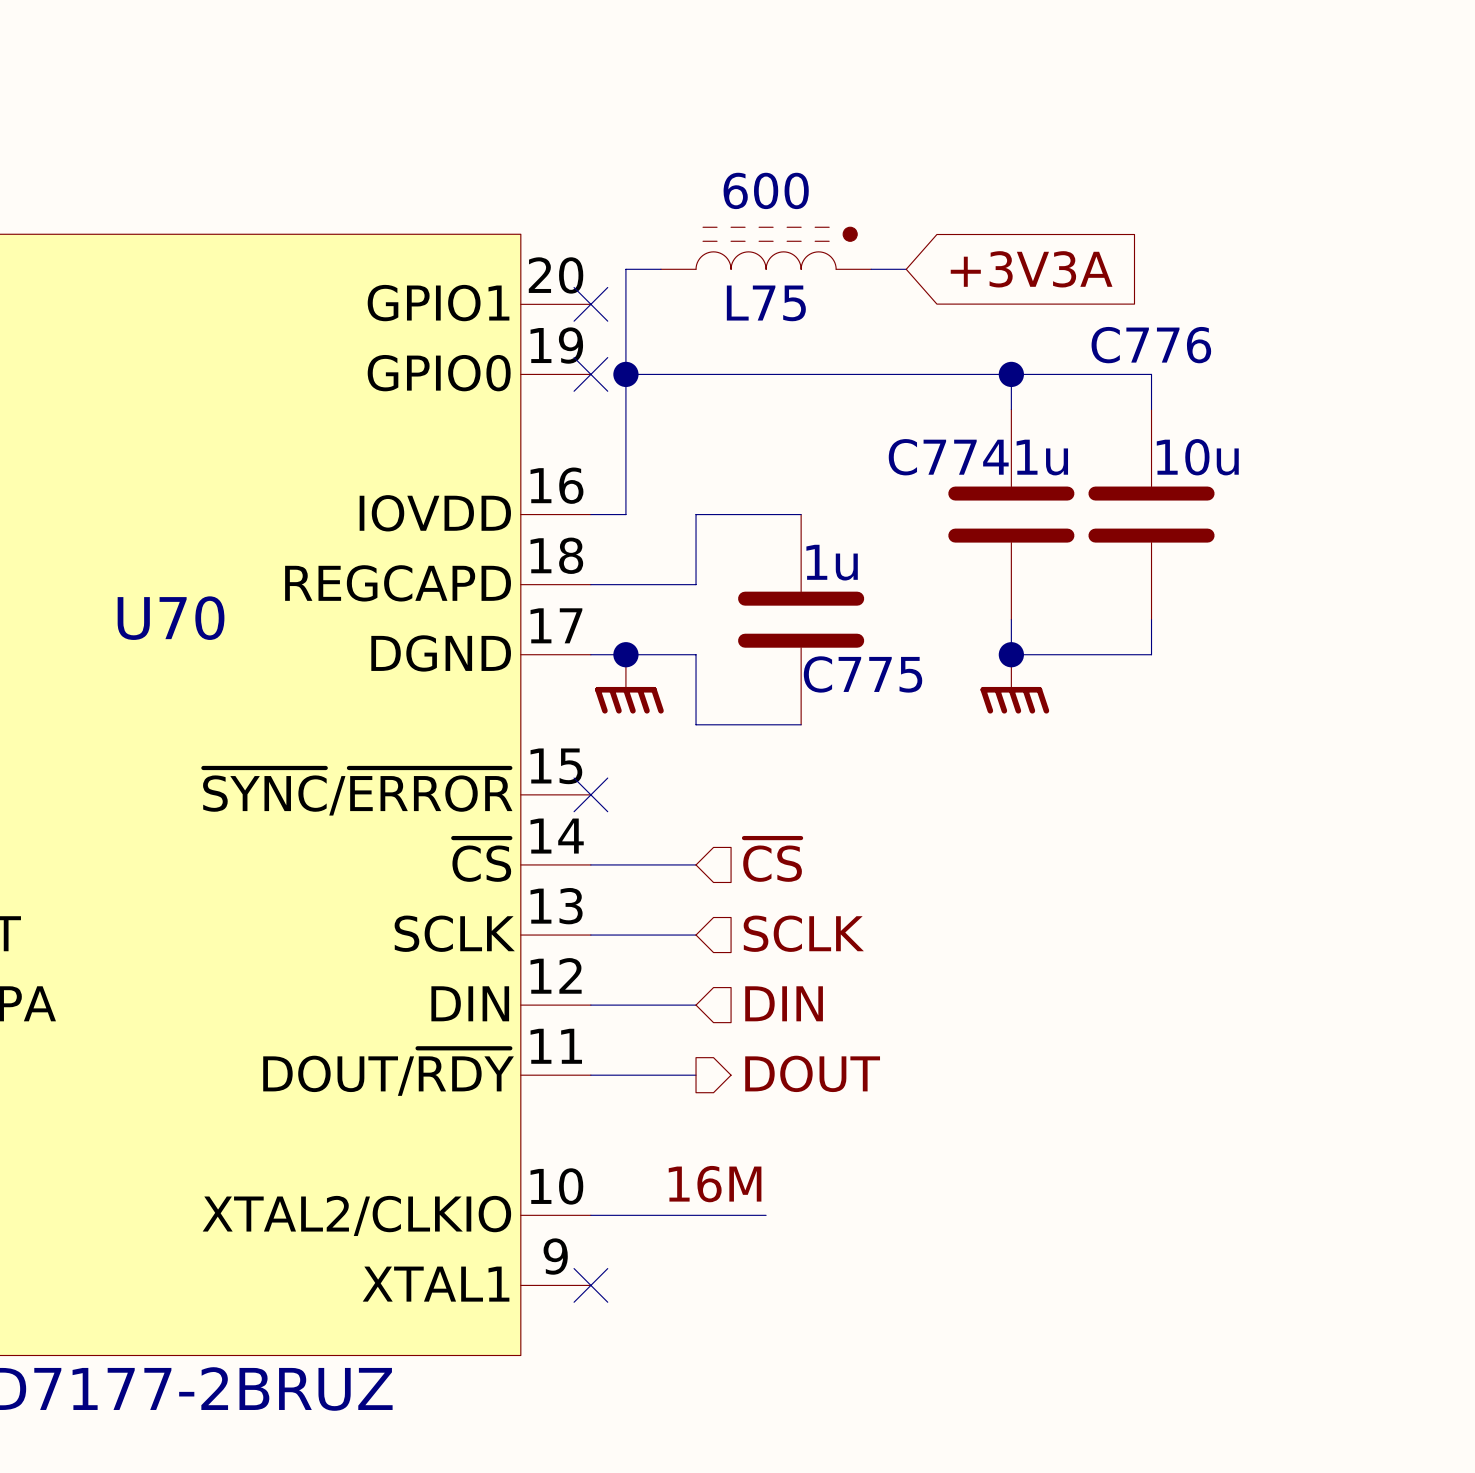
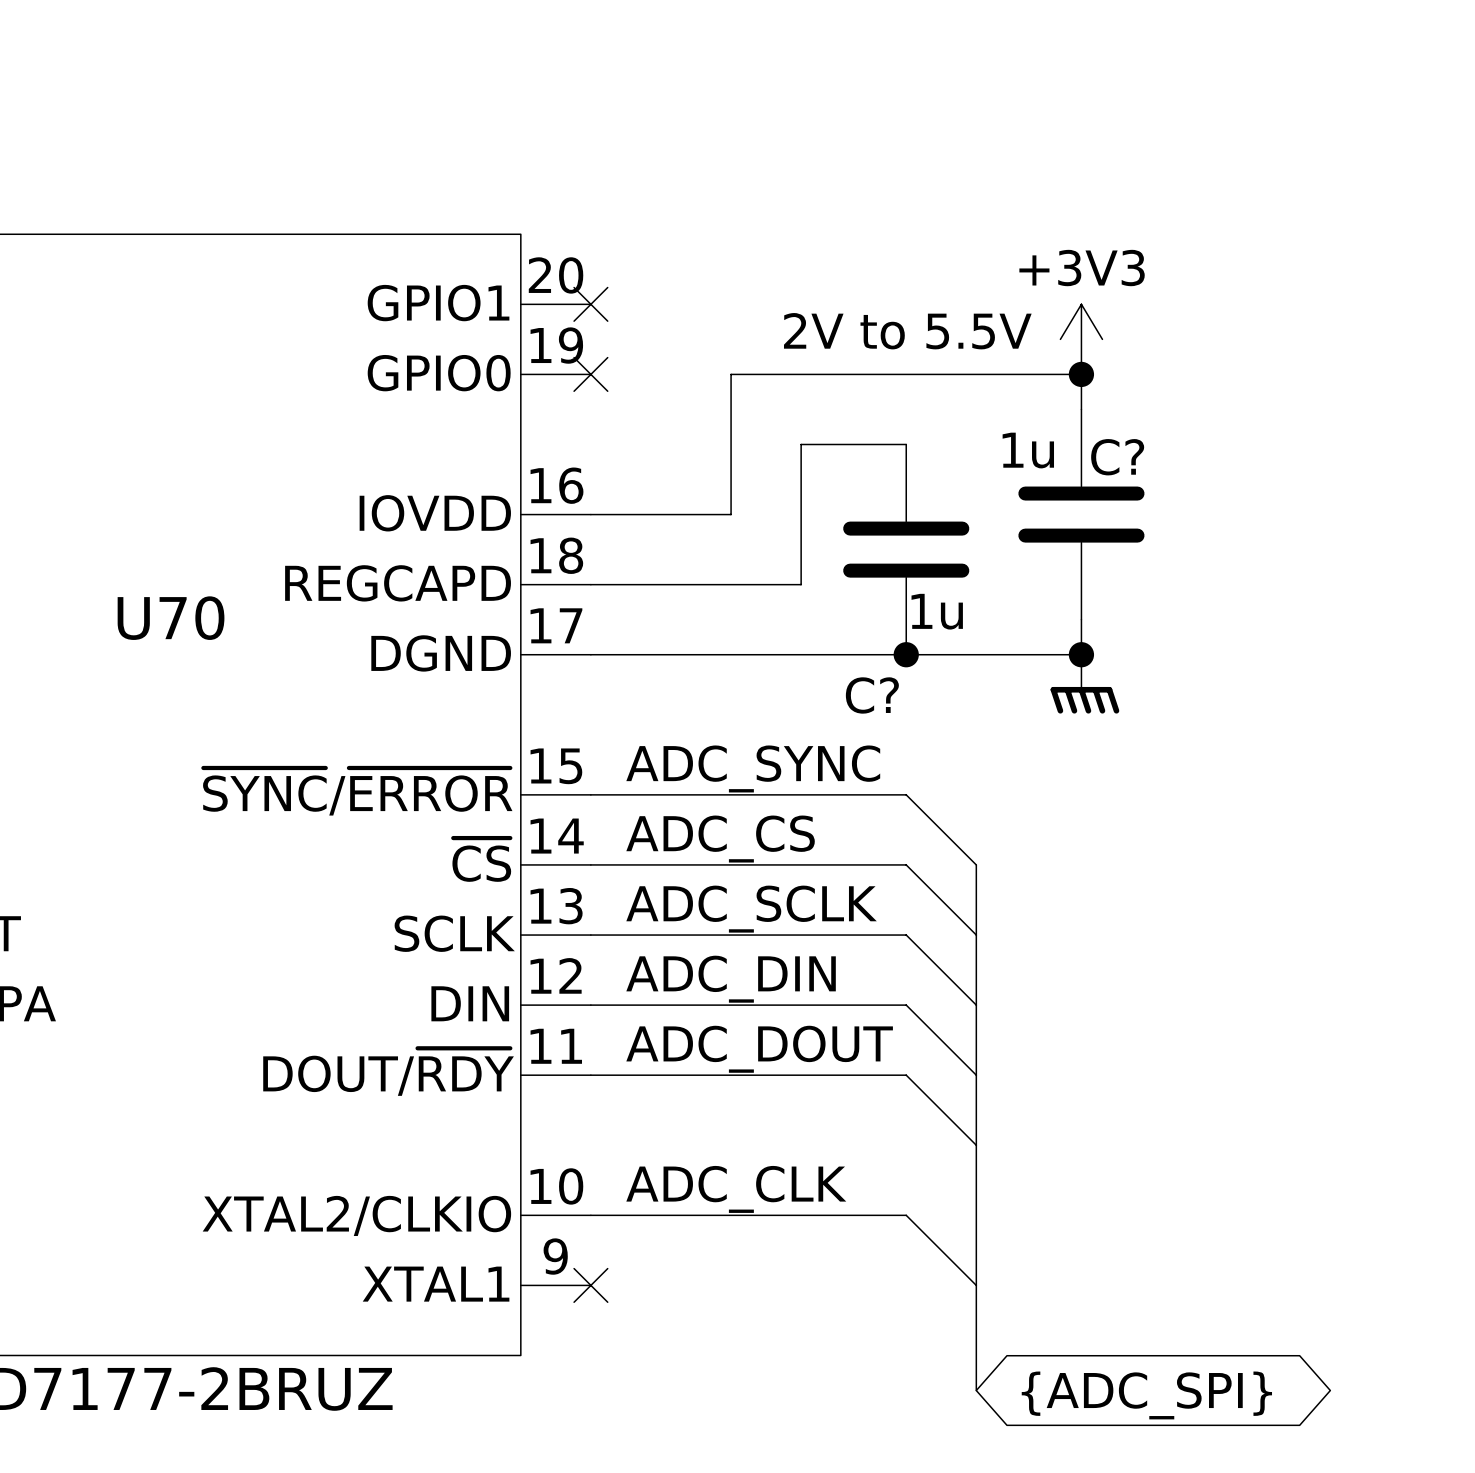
L75: 600 (766, 248) -> none
wire: (660, 269) (625, 269) (625, 514) -> none
wire: (871, 269) (906, 269) -> none
global label: +3V3A (1031, 269) -> none
text: none -> 2V to 5.5V (907, 331)
power symbol: none -> +3V3 (1081, 339)
wire: (625, 374) (731, 374) -> none
junction: (625, 374) -> none
wire: (1011, 374) (1011, 409) -> none
junction position: (1011, 374) -> (1081, 374)
wire: (1081, 374) (1151, 374) (1151, 409) -> (1081, 374) (1081, 409)
wire: none -> (906, 444) (801, 444) (801, 584) (696, 584)
wire: (696, 514) (696, 584) -> (696, 514) (625, 514)
wire: (731, 514) (801, 514) -> (731, 514) (731, 374)
C774: 1u (1011, 514) -> none
C?: none -> 1u (1081, 514)
C776: 10u (1151, 514) -> none
C?: none -> 1u (906, 549)
C775: 1u (801, 619) -> none
wire: (1011, 619) (1011, 654) -> none
wire: (1151, 619) (1151, 654) (1081, 654) -> (1081, 619) (1081, 654)
junction: (625, 654) -> none
wire: (696, 654) (696, 724) (801, 724) -> (696, 654) (1011, 654)
junction: none -> (906, 654)
junction: (1011, 654) -> none
junction: none -> (1081, 654)
power symbol: (629, 684) -> none
power symbol position: (1014, 684) -> (1084, 684)
label: none -> ADC_SYNC (753, 768)
wire: none -> (590, 794) (906, 794) (976, 864)
no-connect mark: (590, 794) -> none
label: none -> ADC_CS (720, 839)
hierarchical label: ~{CS} (772, 859) -> none
wire: none -> (696, 864) (906, 864) (976, 935)
bus: none -> (976, 864) (976, 1390)
label: none -> ADC_SCLK (751, 909)
hierarchical label: SCLK (803, 933) -> none
wire: none -> (696, 935) (906, 935) (976, 1005)
label: none -> ADC_DIN (731, 979)
hierarchical label: DIN (784, 1003) -> none
wire: none -> (696, 1005) (906, 1005) (976, 1075)
label: none -> ADC_DOUT (759, 1049)
hierarchical label: DOUT (812, 1073) -> none
wire: none -> (696, 1075) (906, 1075) (976, 1145)
label: 16M (715, 1184) -> none
label: none -> ADC_CLK (736, 1189)
wire: none -> (766, 1215) (906, 1215) (976, 1285)
global label: none -> {ADC_SPI} (1146, 1395)

